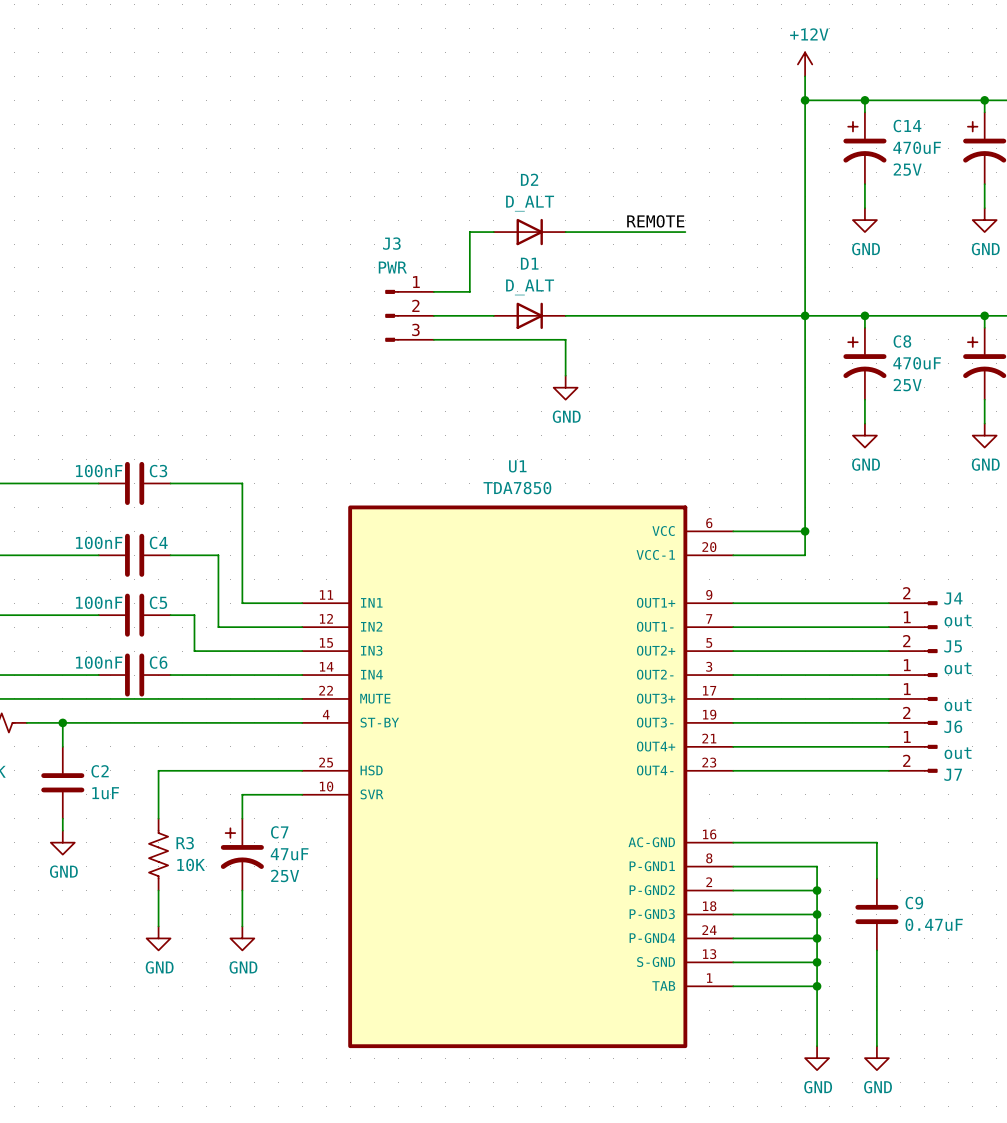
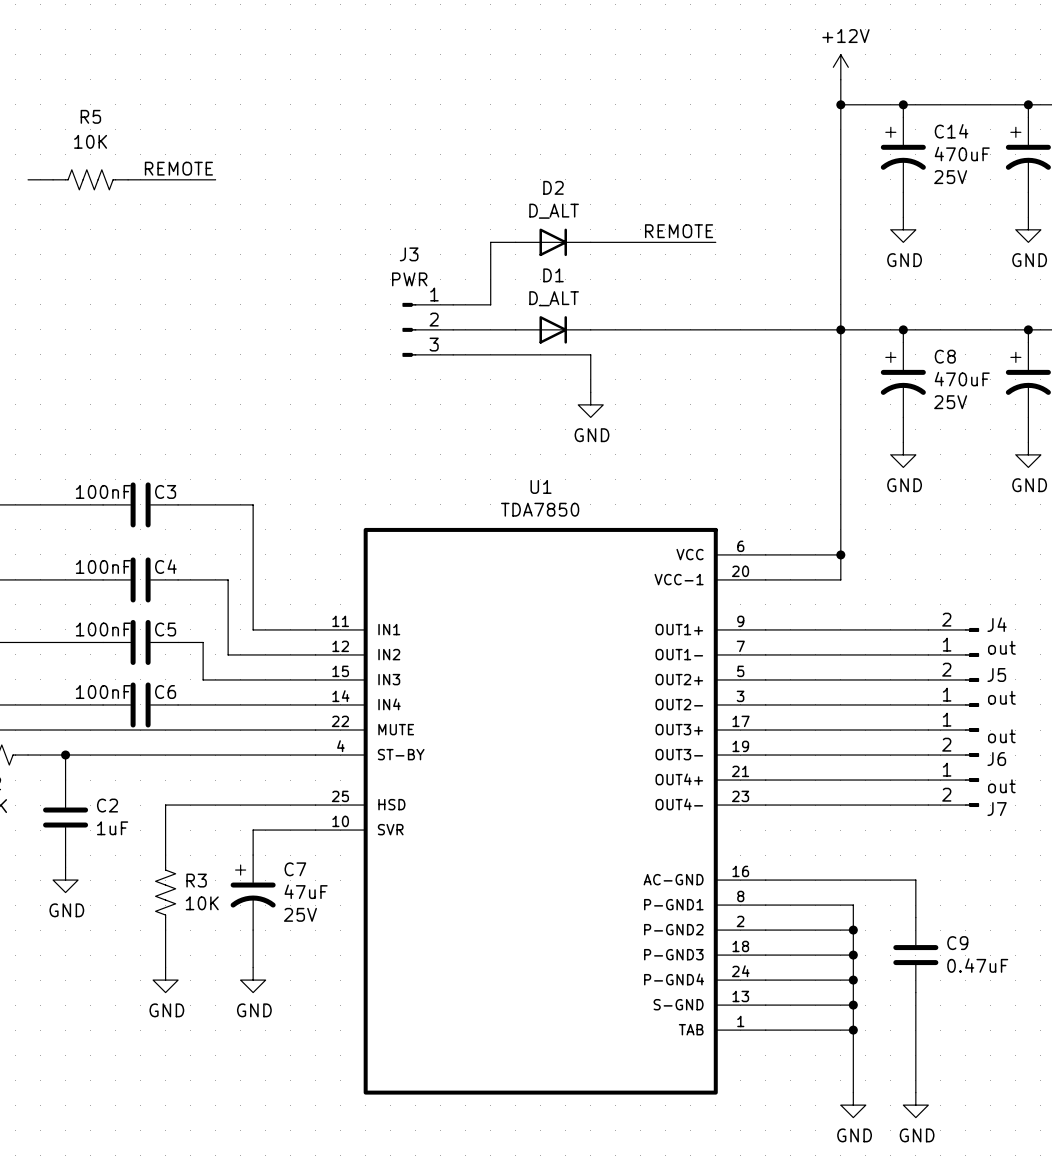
label: none -> REMOTE (178, 168)
wire: none -> (28, 179) (53, 179)
R5: none -> 10K (90, 179)
wire: none -> (128, 179) (215, 179)

